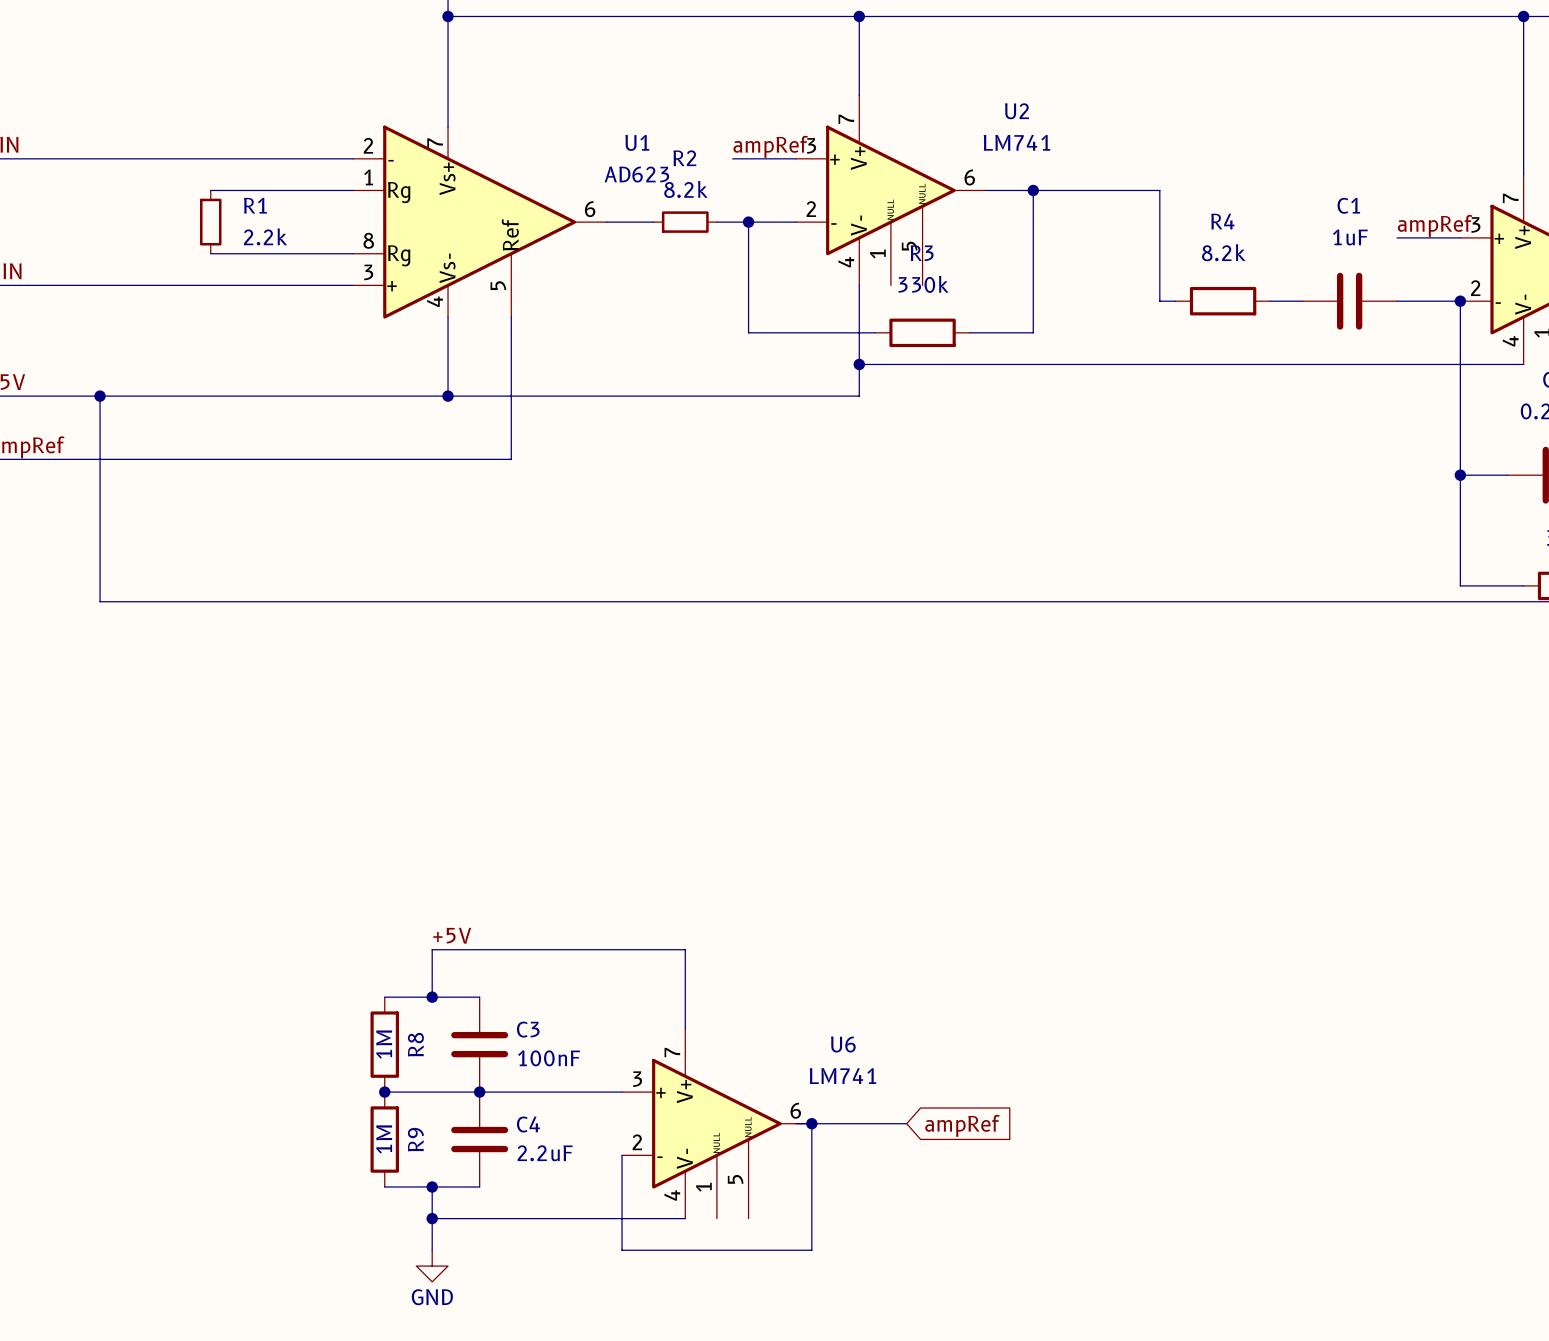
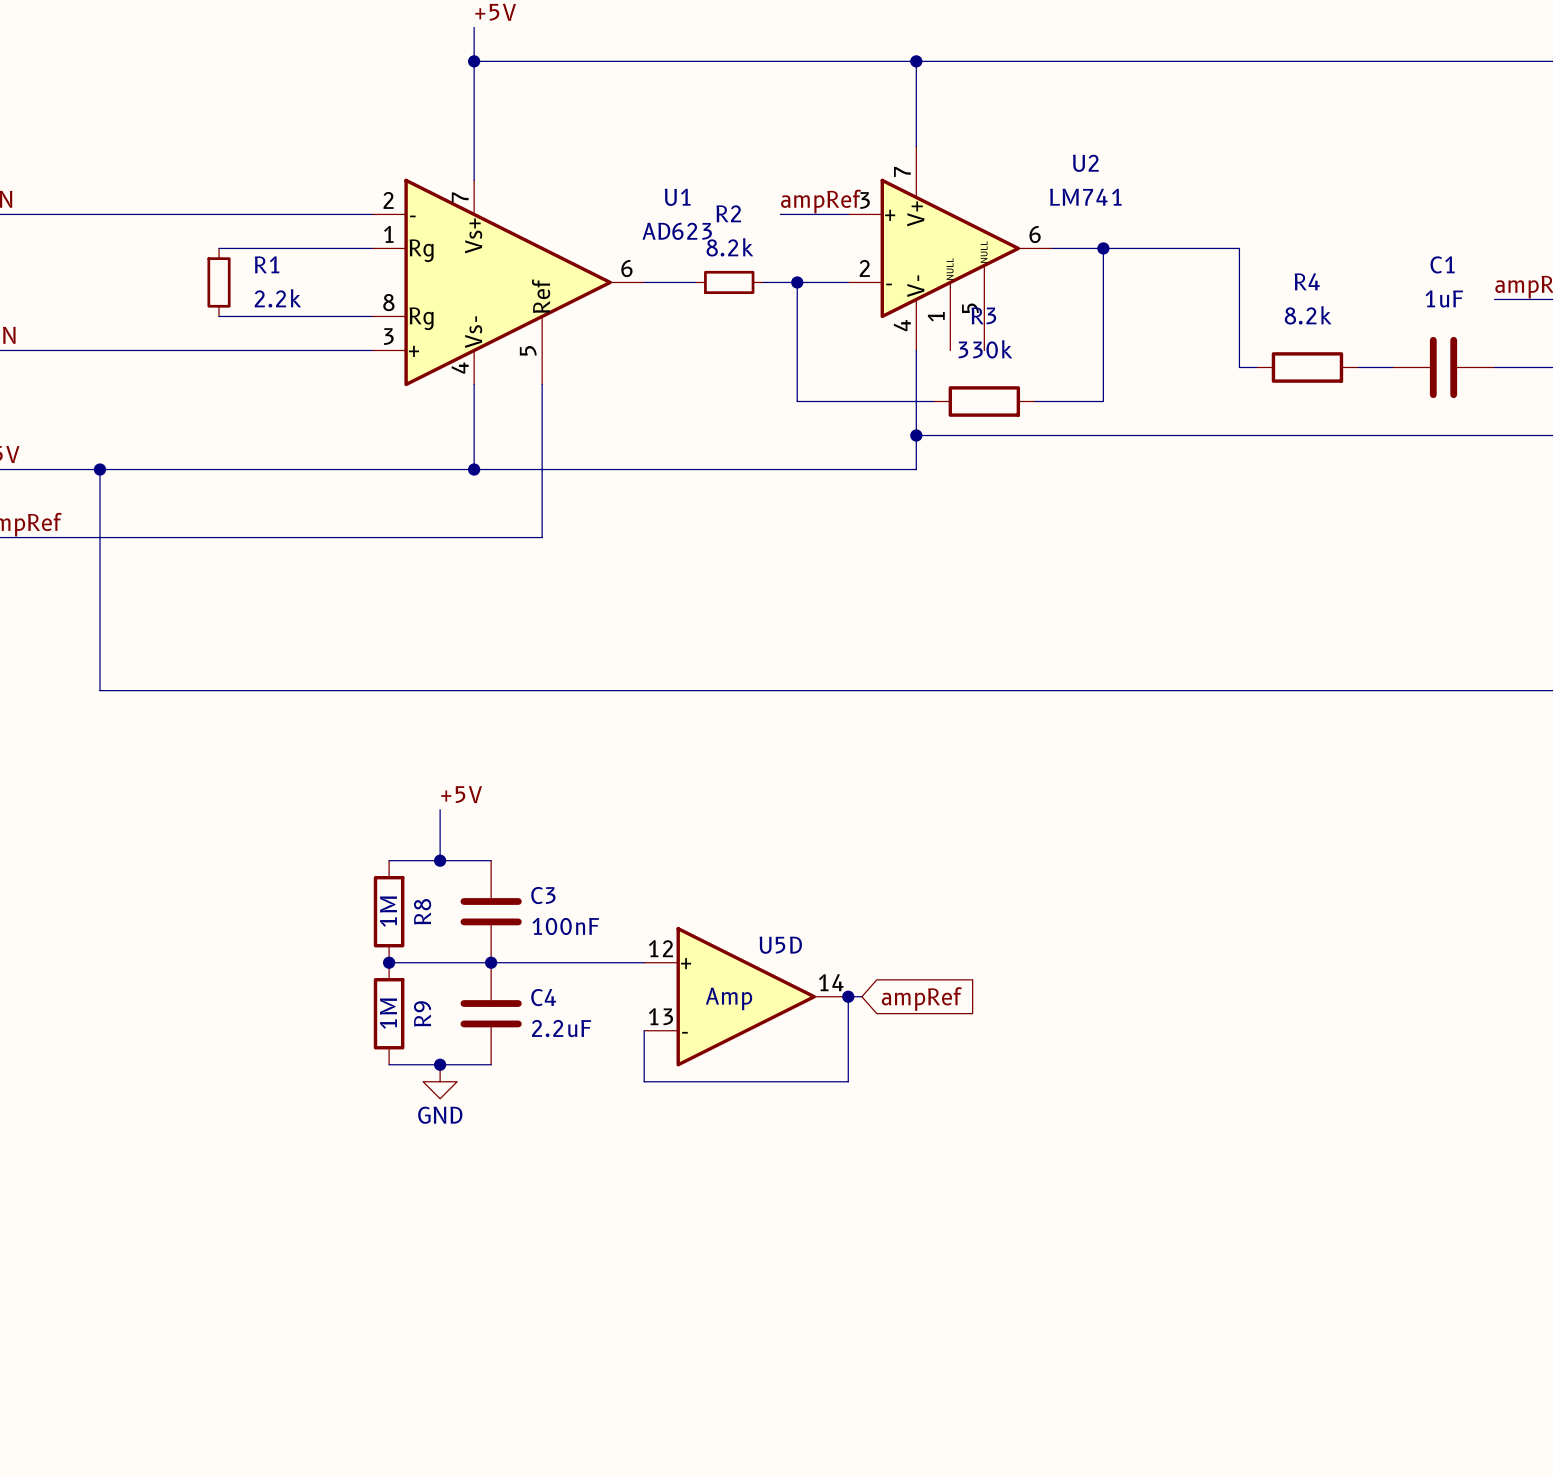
wire: none -> (440, 809) (440, 860)
junction: none -> (440, 860)
junction: none -> (389, 962)
junction: none -> (491, 962)
U5D: none -> Amp (746, 996)
junction: none -> (848, 996)
wire: none -> (861, 996) (848, 996) (848, 1081) (644, 1081) (644, 1030)
label position: +5V (452, 935) -> +5V (461, 794)
wire: (432, 949) (432, 997) -> (457, 1064) (389, 1064)
wire: (463, 949) (685, 949) (685, 1028) -> none
wire: (384, 997) (479, 997) -> (389, 860) (491, 860)
junction position: (432, 997) -> (440, 1064)
R8 position: (384, 1044) -> (389, 911)
C3 position: (479, 1044) -> (491, 911)
wire: (384, 1092) (622, 1092) -> (389, 962) (644, 962)
junction: (384, 1092) -> none
junction: (479, 1092) -> none
U6: LM741 (716, 1123) -> none
wire: (796, 1123) (906, 1123) -> none
wire: (811, 1123) (811, 1250) (622, 1250) (622, 1155) -> none
junction: (811, 1123) -> none
global label position: ampRef (962, 1125) -> ampRef (921, 998)
R9 position: (384, 1139) -> (389, 1013)
C4 position: (479, 1139) -> (491, 1013)
wire: (384, 1186) (479, 1186) -> none
wire: (432, 1186) (432, 1250) -> none
junction: (432, 1186) -> none
wire: (432, 1218) (685, 1218) -> none
junction: (432, 1218) -> none
power symbol position: GND (432, 1266) -> GND (440, 1081)

